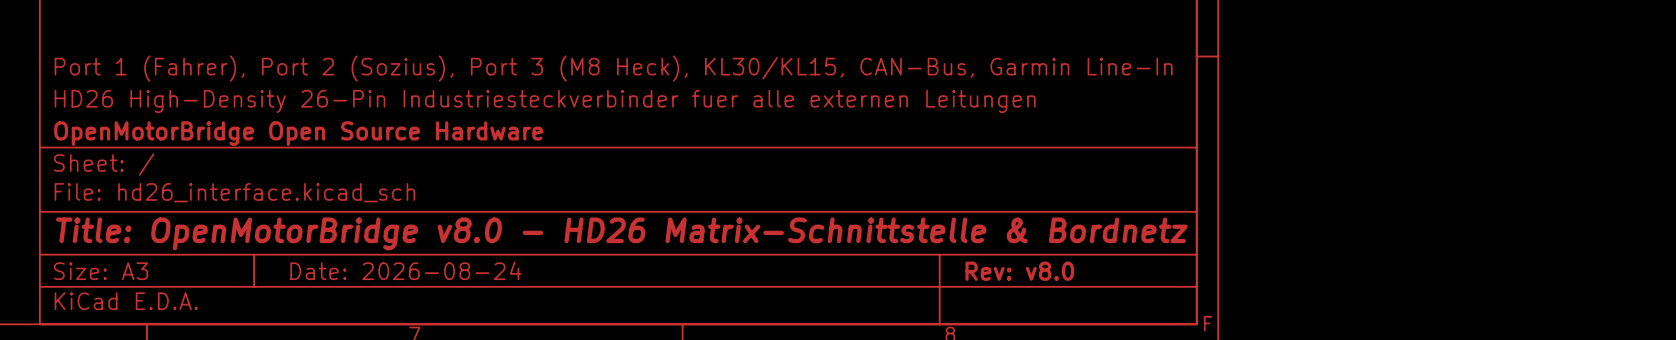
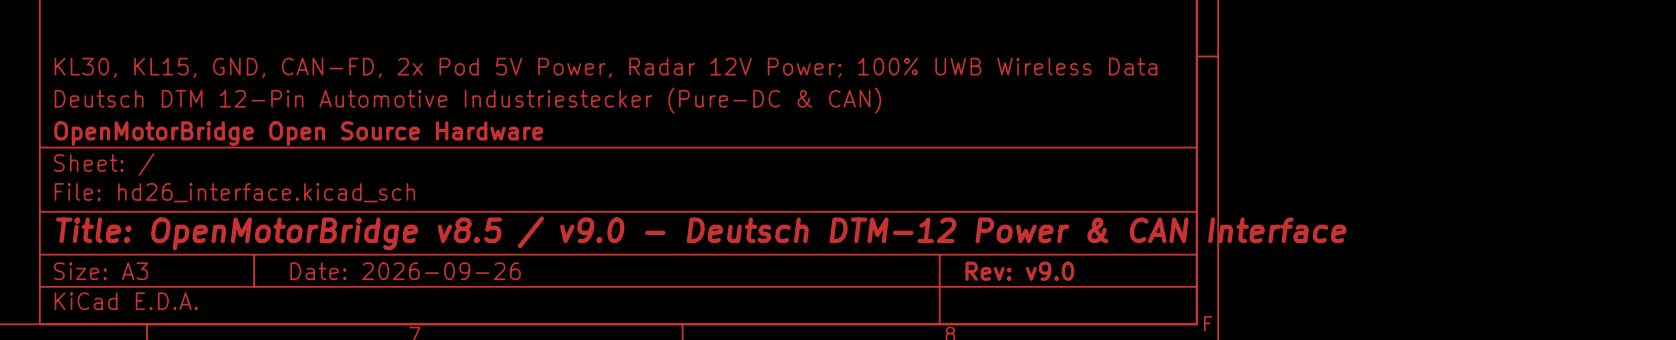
title block: Port 1 (Fahrer), Port 2 (Sozius), Port 3 (M8 Heck), KL30/KL15, CAN-Bus, Garmin Line-In (613, 68) -> KL30, KL15, GND, CAN-FD, 2x Pod 5V Power, Radar 12V Power; 100% UWB Wireless Data (606, 67)
title block: HD26 High-Density 26-Pin Industriesteckverbinder fuer alle externen Leitungen (545, 101) -> Deutsch DTM 12-Pin Automotive Industriestecker (Pure-DC & CAN) (467, 100)
title block: Title: OpenMotorBridge v8.0 - HD26 Matrix-Schnittstelle & Bordnetz (621, 233) -> Title: OpenMotorBridge v8.5 / v9.0 - Deutsch DTM-12 Power & CAN Interface (701, 233)
title block: Date: 2026-08-24 (405, 270) -> Date: 2026-09-26 (405, 271)
title block: Rev: v8.0 (1019, 271) -> Rev: v9.0 (1019, 271)

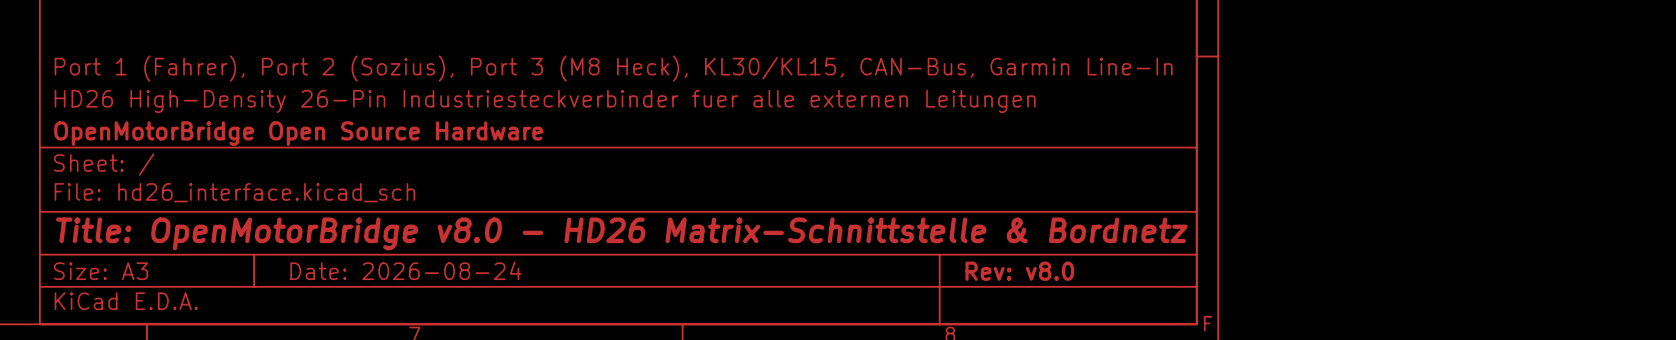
title block: KL30, KL15, GND, CAN-FD, 2x Pod 5V Power, Radar 12V Power; 100% UWB Wireless Data (606, 67) -> Port 1 (Fahrer), Port 2 (Sozius), Port 3 (M8 Heck), KL30/KL15, CAN-Bus, Garmin Line-In (613, 68)
title block: Deutsch DTM 12-Pin Automotive Industriestecker (Pure-DC & CAN) (467, 100) -> HD26 High-Density 26-Pin Industriesteckverbinder fuer alle externen Leitungen (545, 101)
title block: Title: OpenMotorBridge v8.5 / v9.0 - Deutsch DTM-12 Power & CAN Interface (701, 233) -> Title: OpenMotorBridge v8.0 - HD26 Matrix-Schnittstelle & Bordnetz (621, 233)
title block: Date: 2026-09-26 (405, 271) -> Date: 2026-08-24 (405, 270)
title block: Rev: v9.0 (1019, 271) -> Rev: v8.0 (1019, 271)

